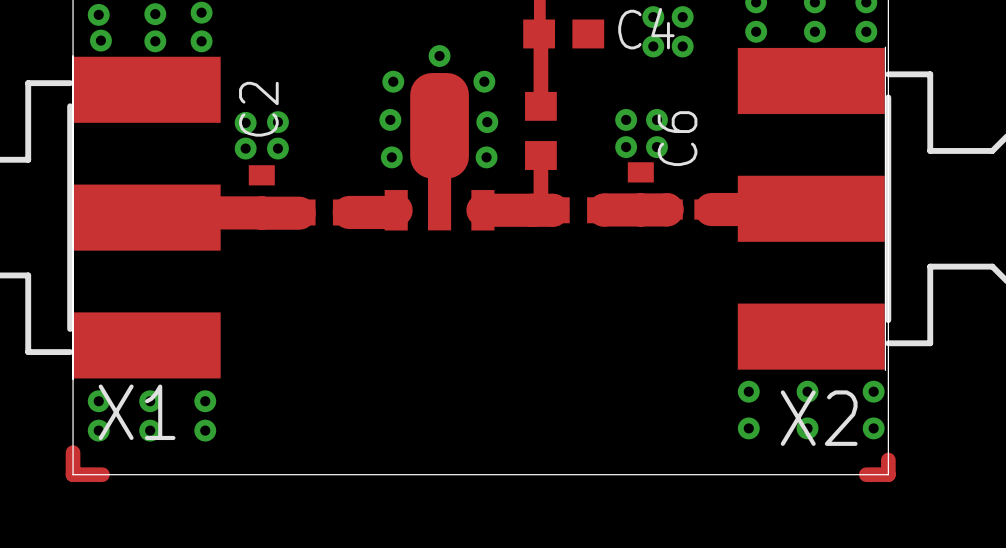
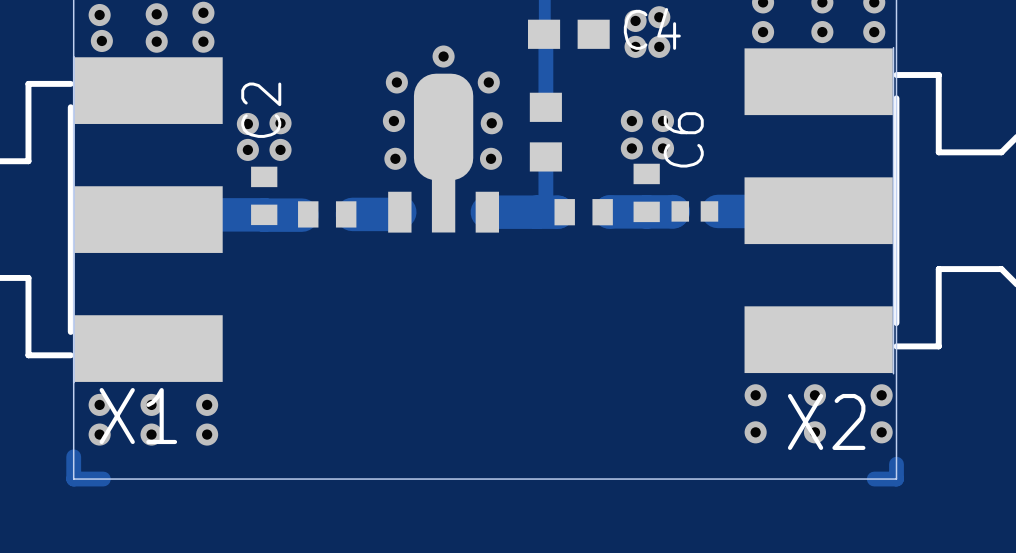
via: (682, 17) -> none
via: none -> (635, 20)
via: none -> (635, 46)
via: (682, 46) -> none

